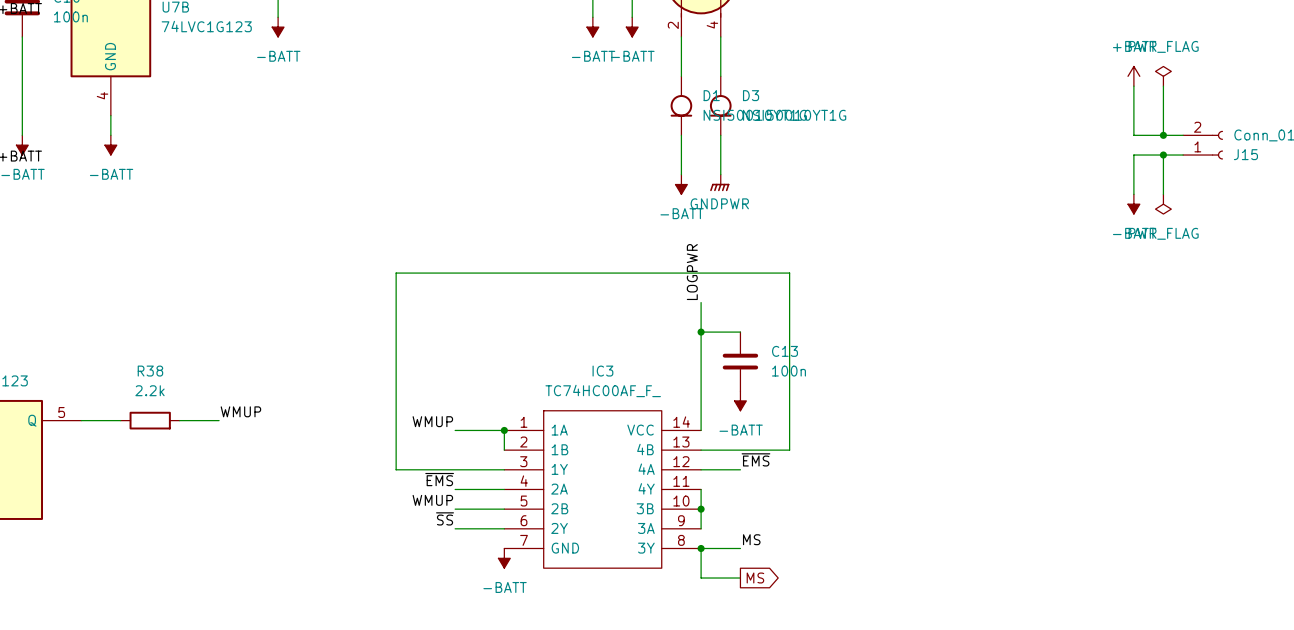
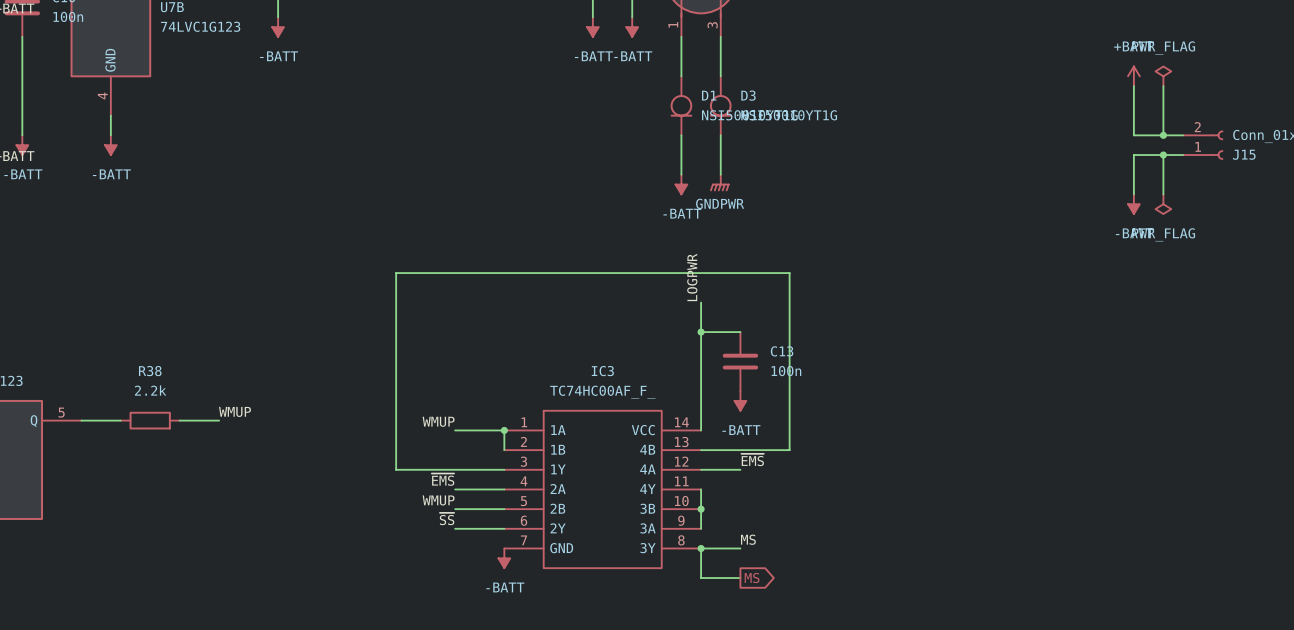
part pin number: 4 (712, 24) -> 3 (712, 25)
part pin number: 2 (673, 25) -> 1 (673, 24)

